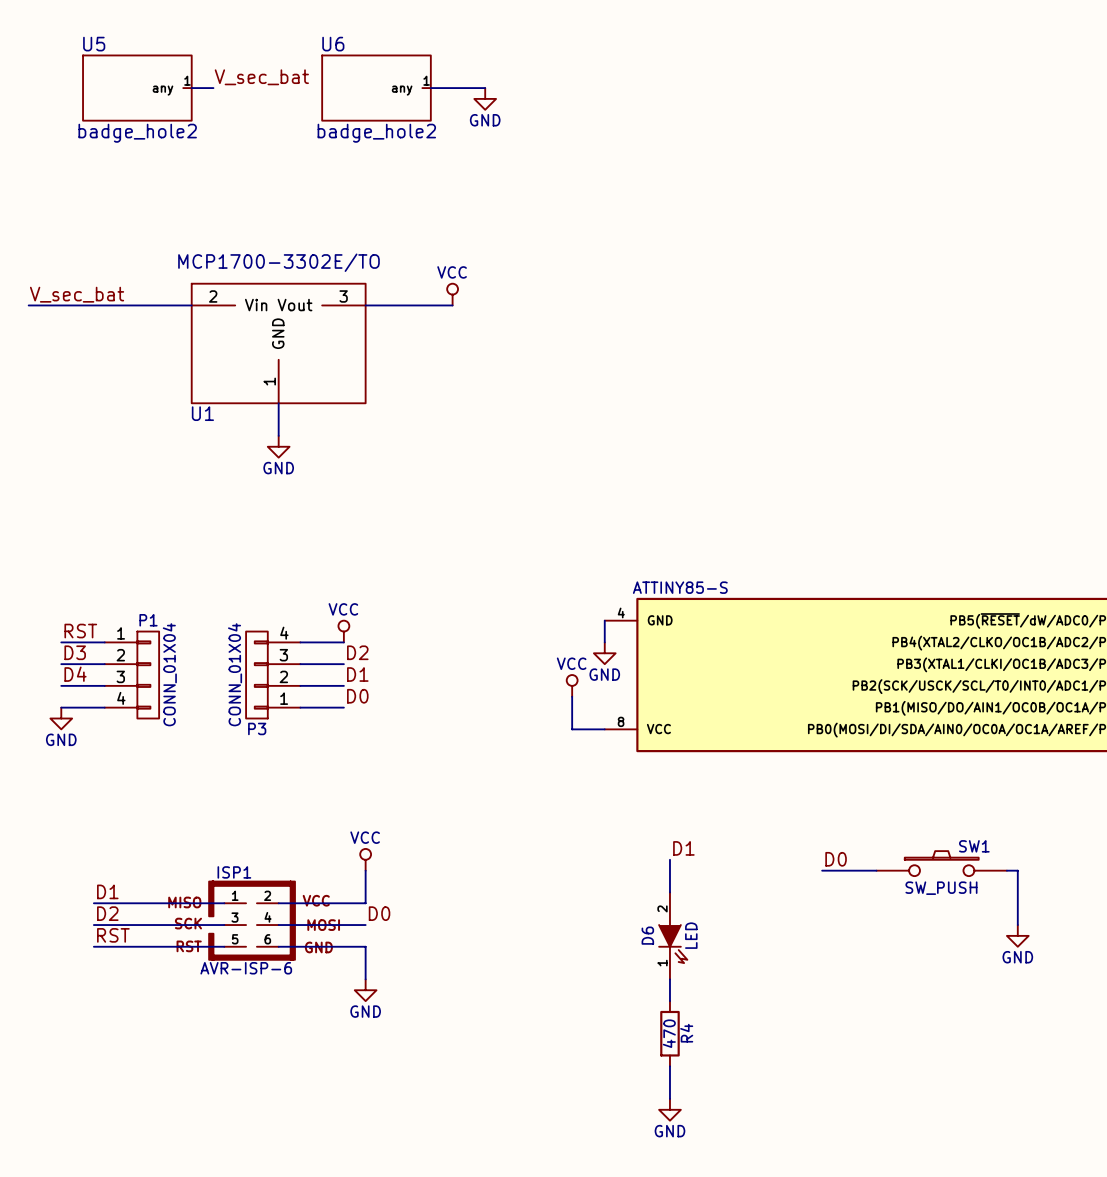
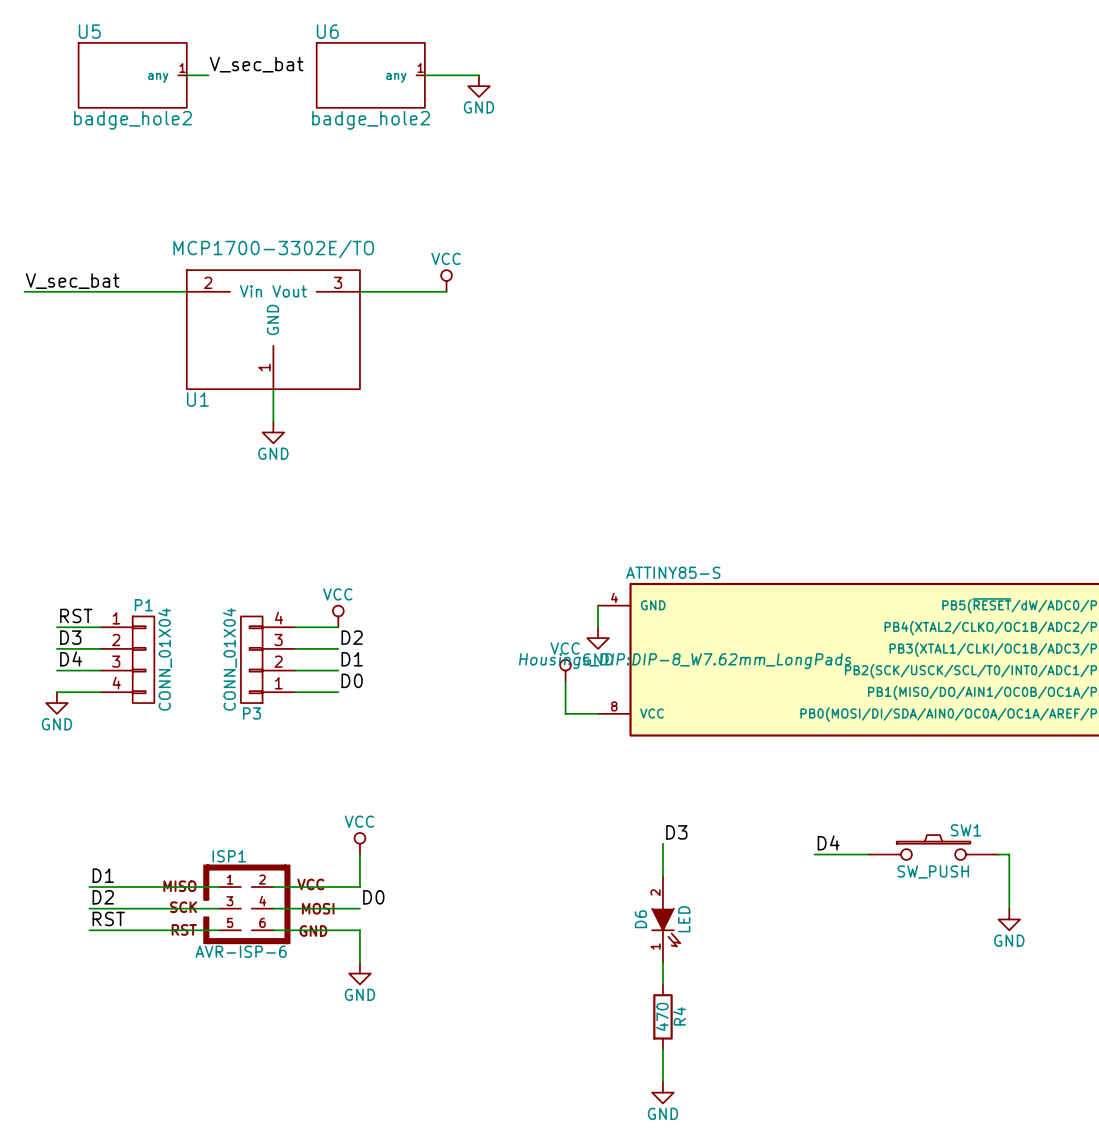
part text: none -> Housings_DIP:DIP-8_W7.62mm_LongPads (685, 661)
label: D1 (683, 848) -> D3 (676, 832)
label: D0 (836, 859) -> D4 (828, 842)

